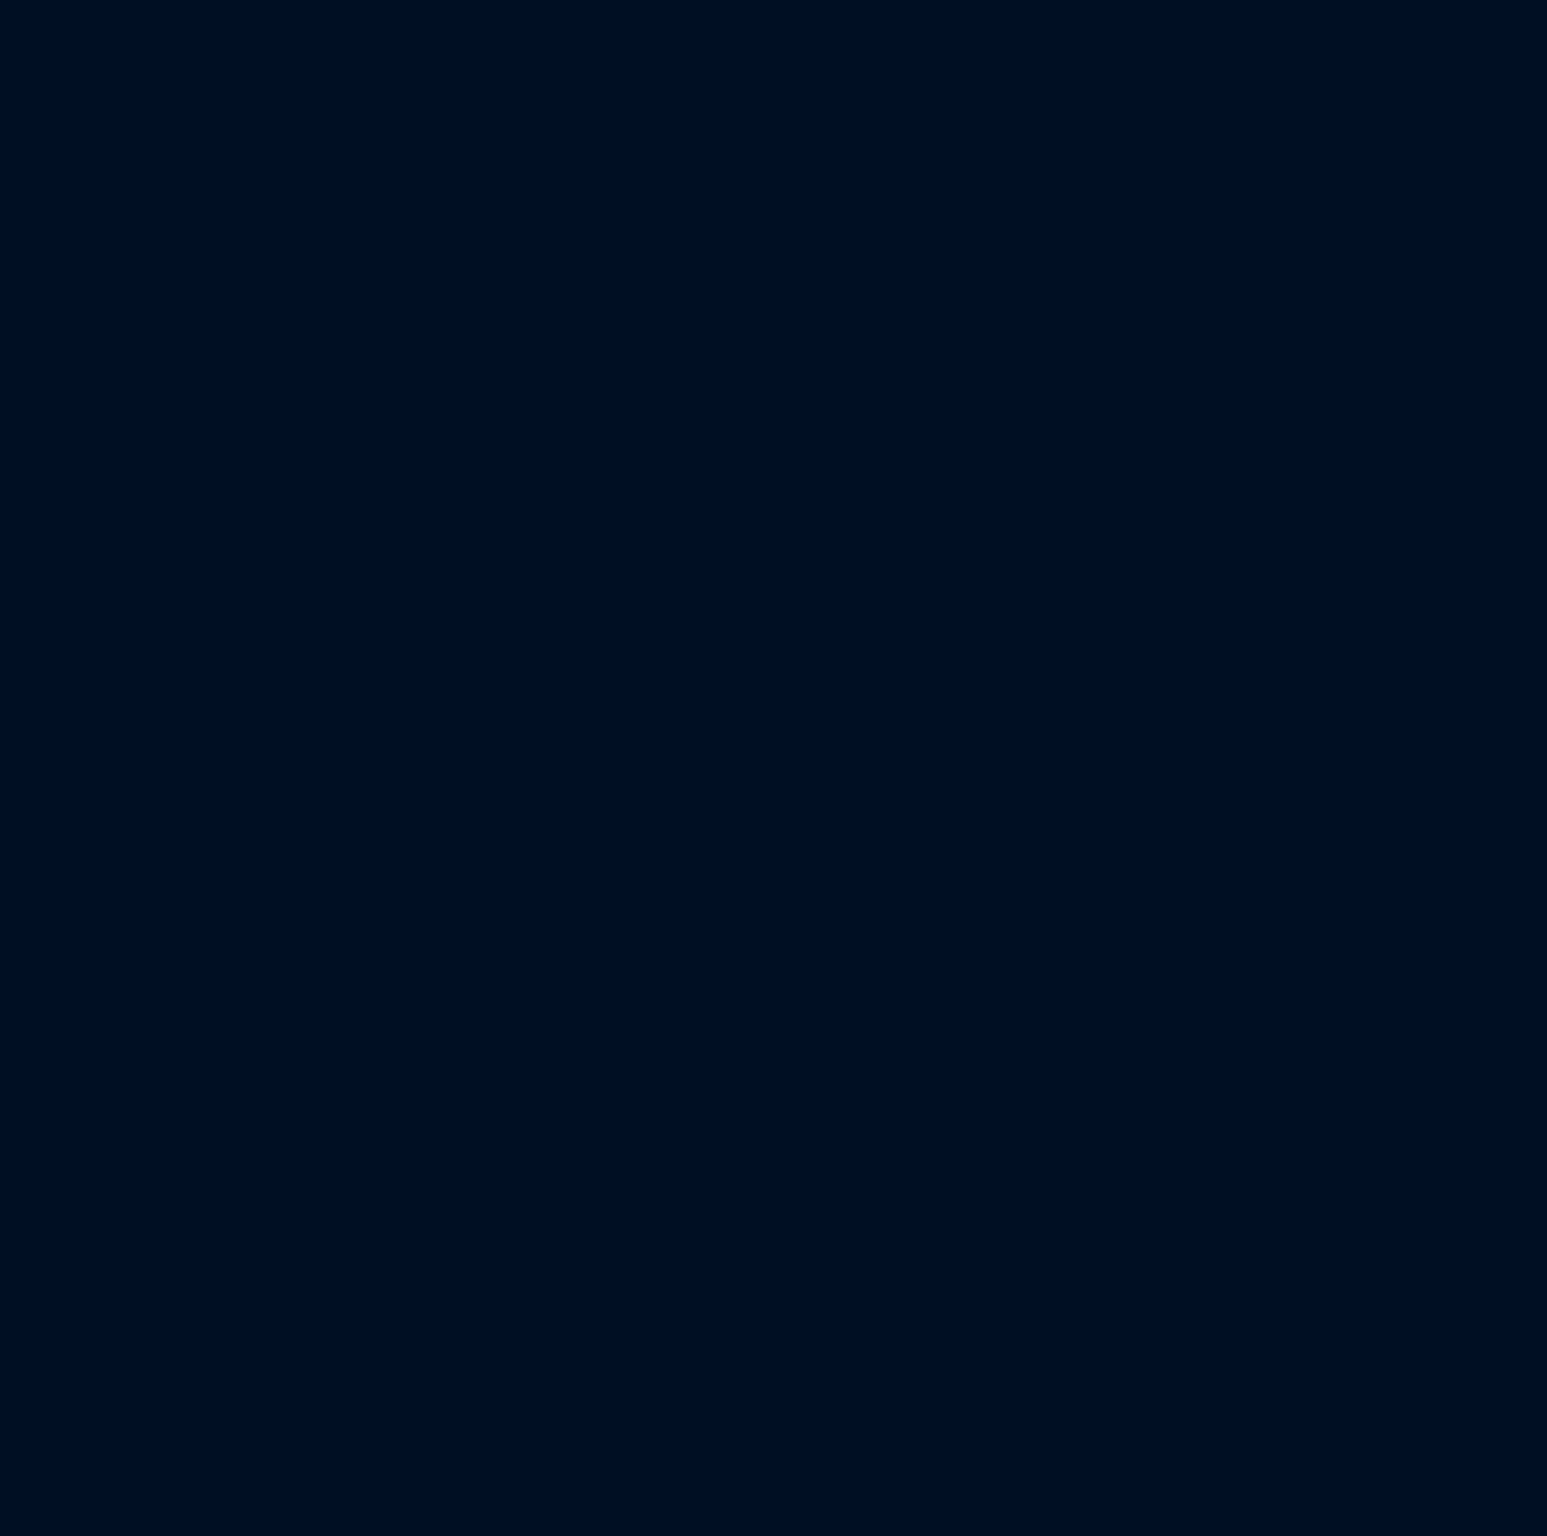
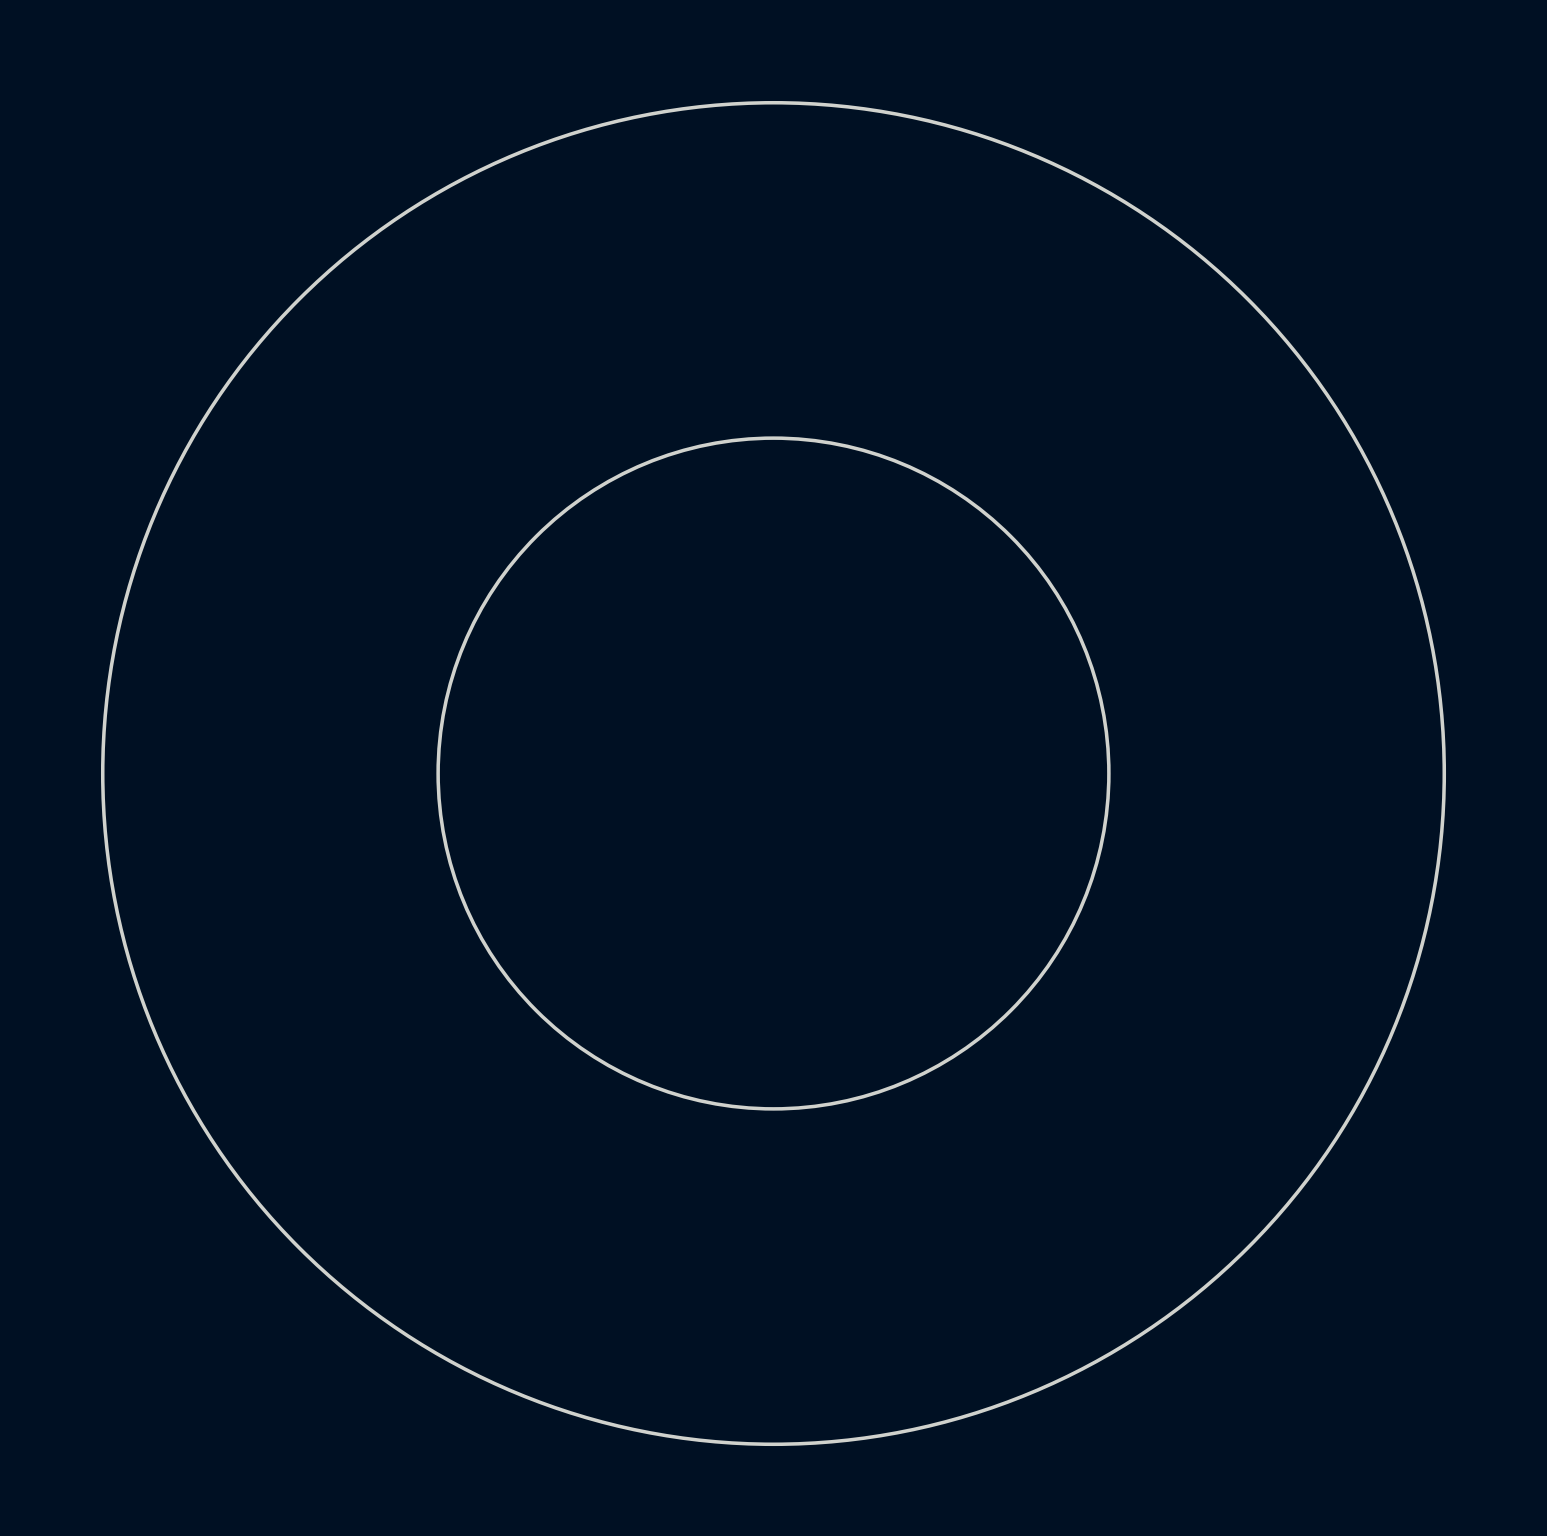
round board edge: none -> [100, 100, 1447, 1447]
round board edge: none -> [436, 436, 1111, 1111]

